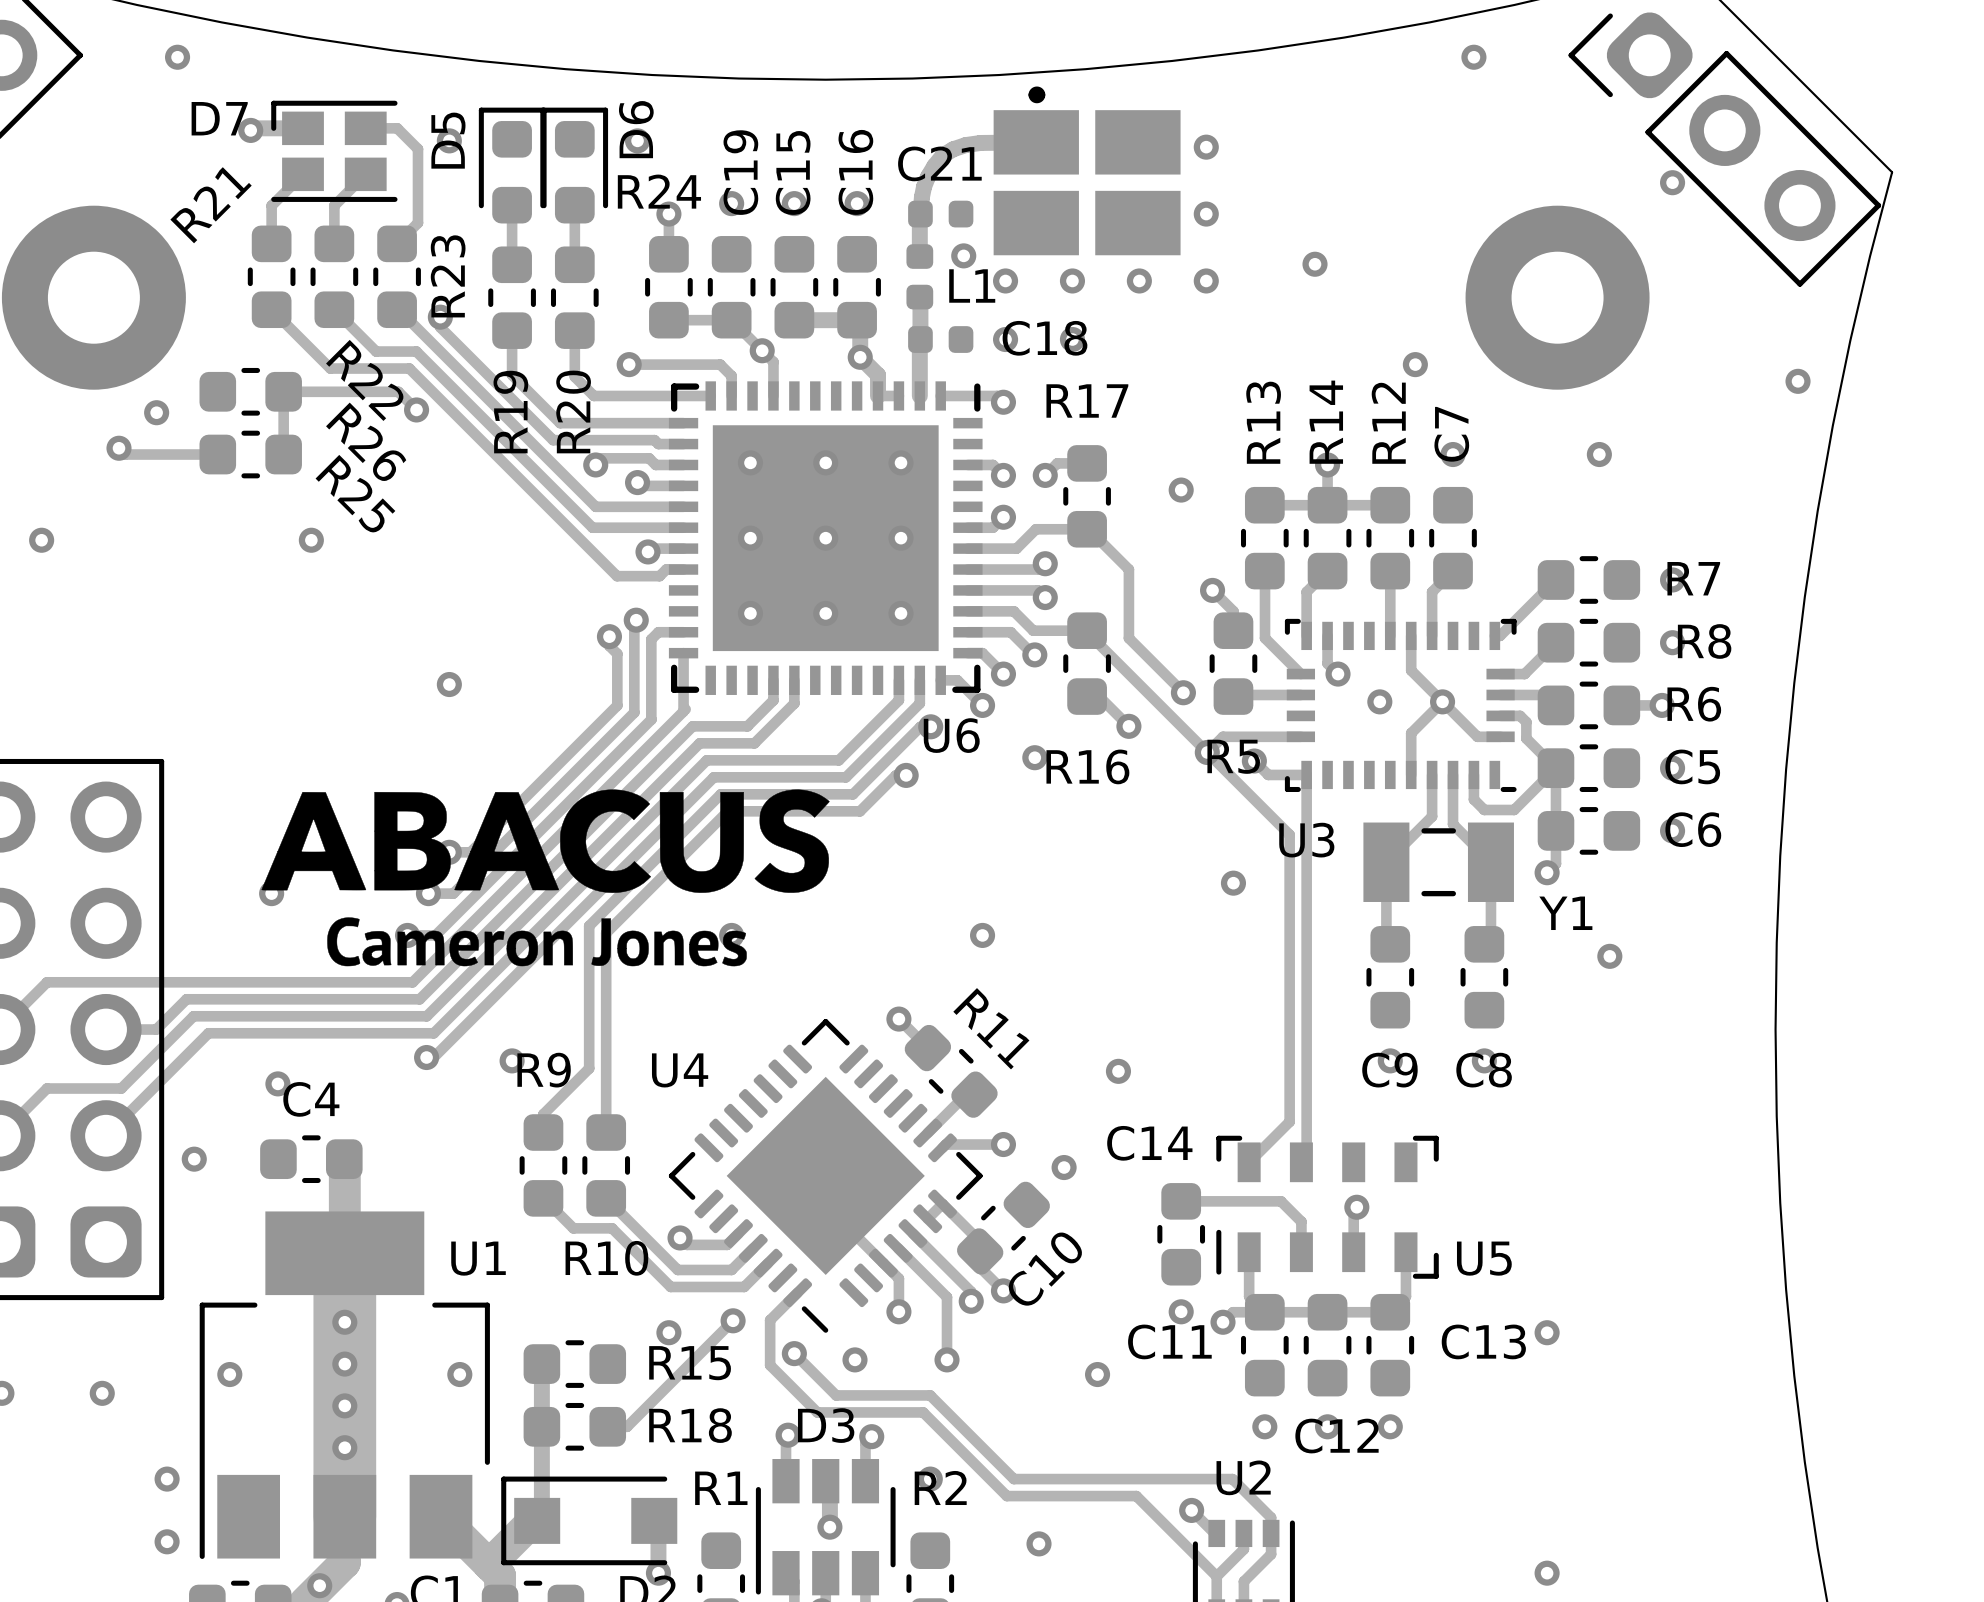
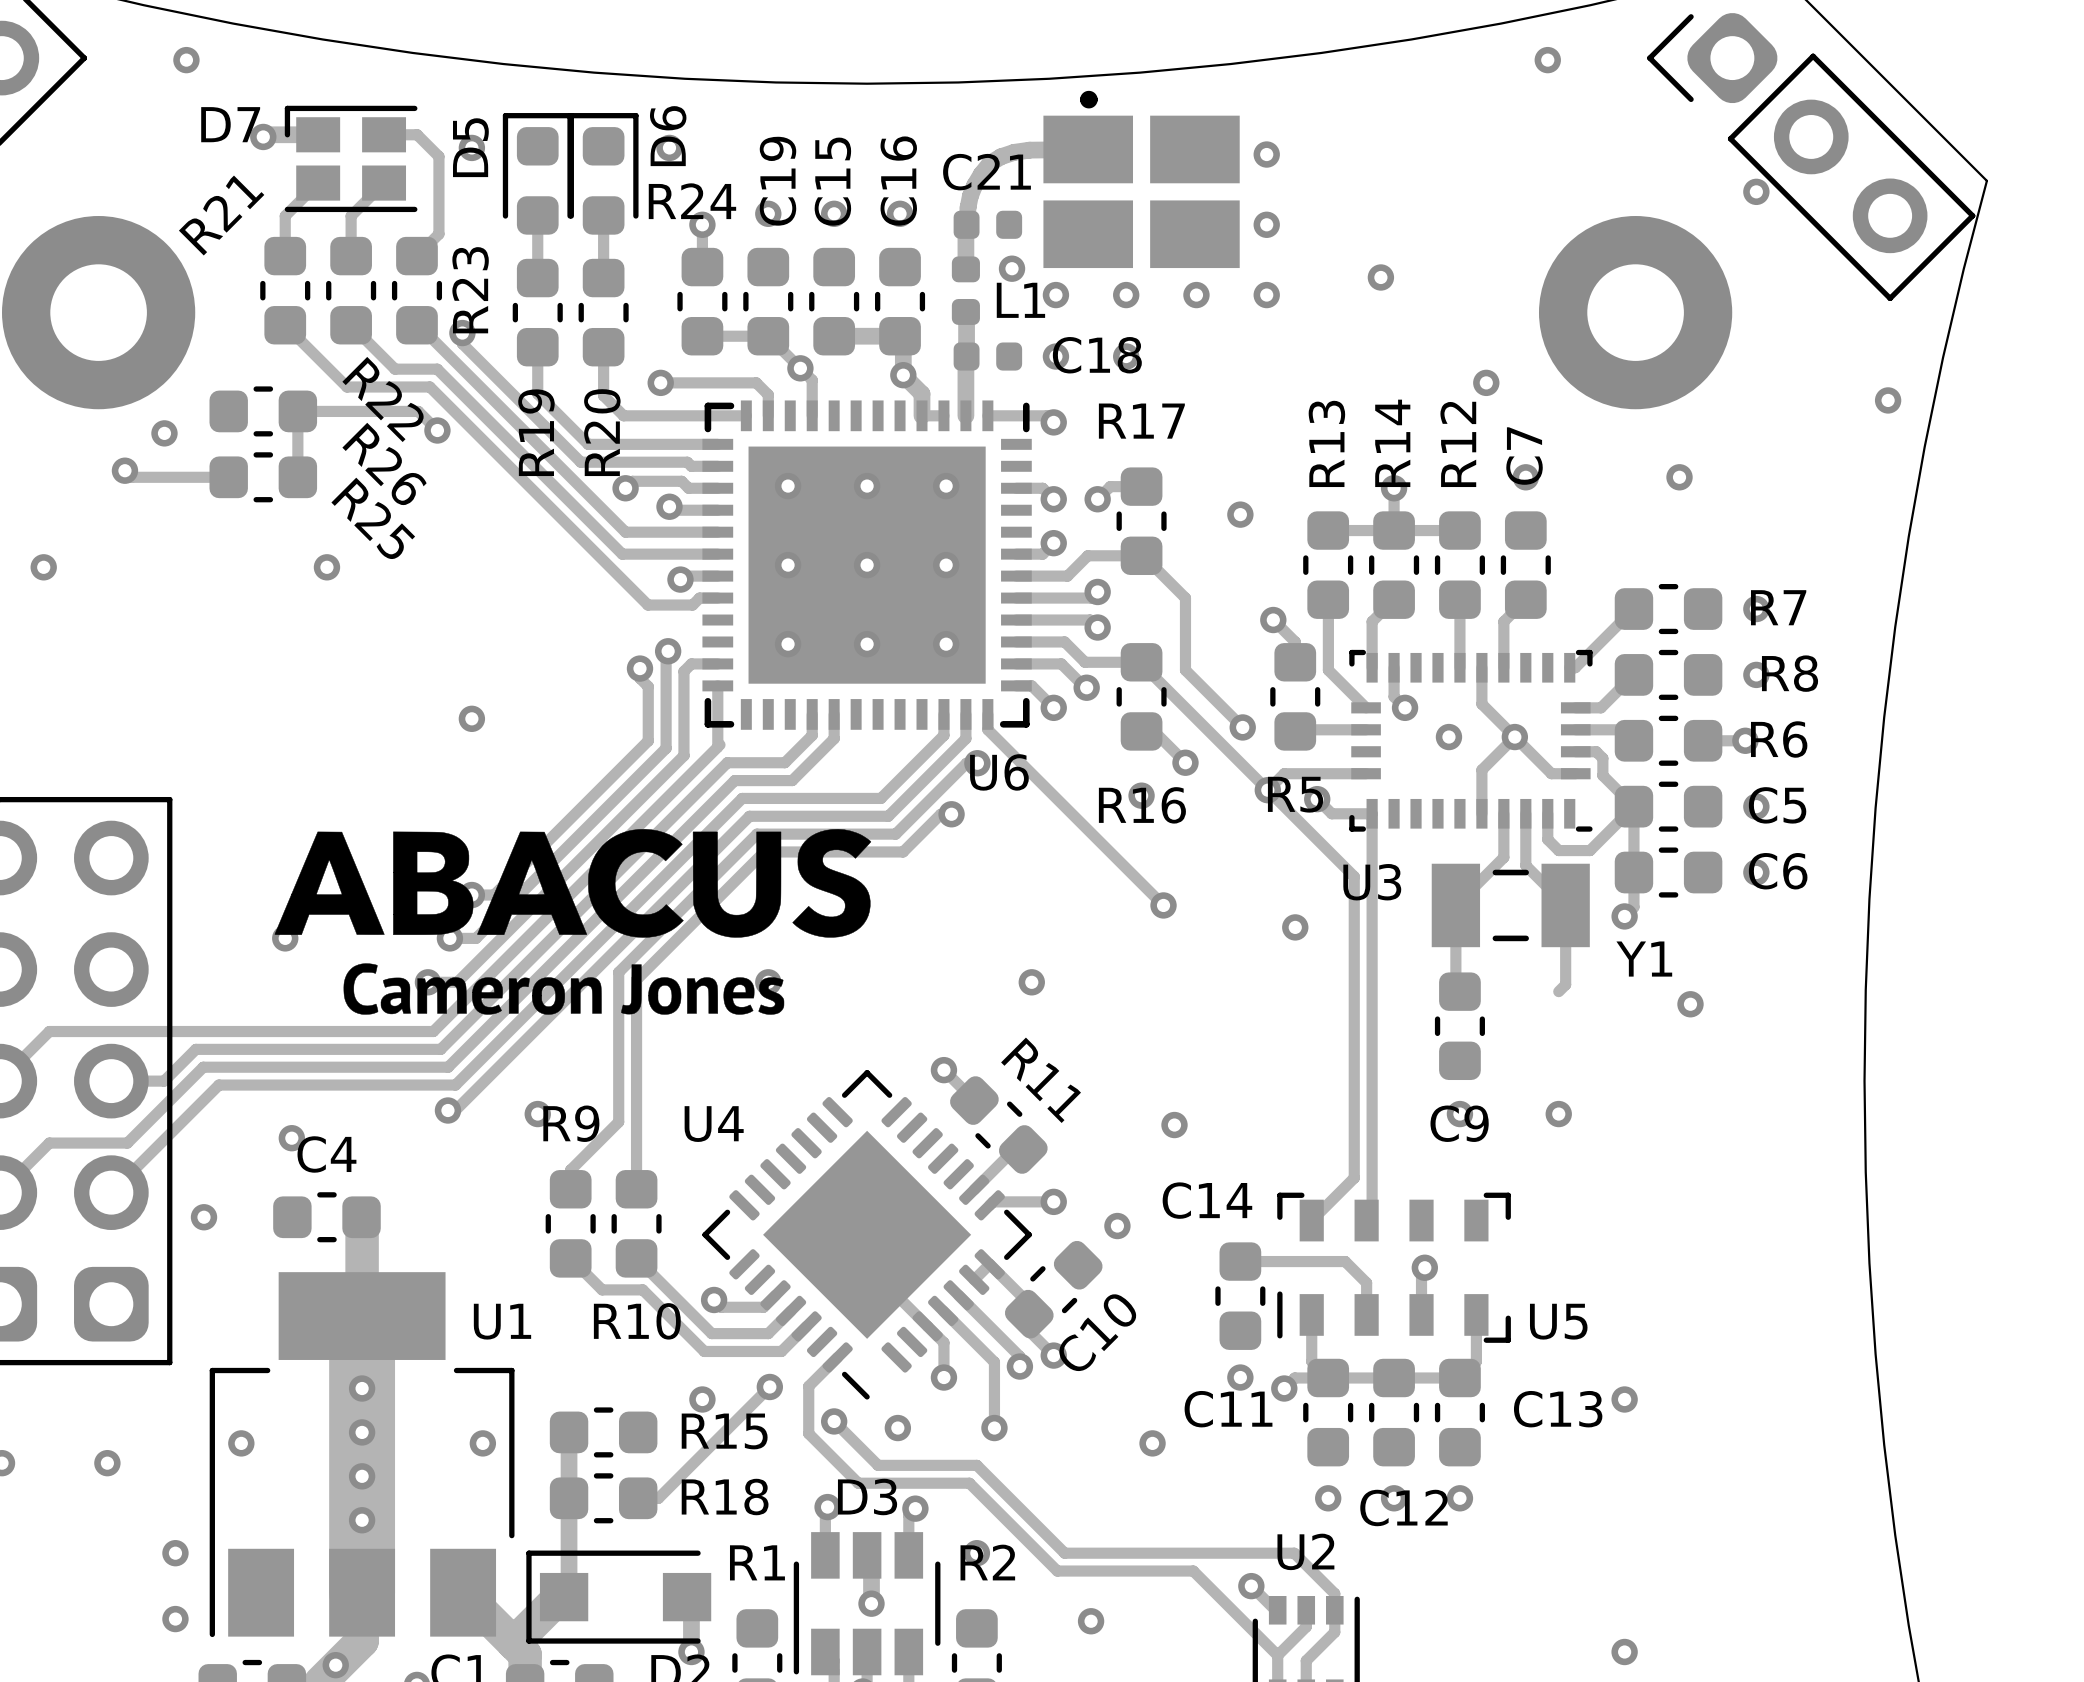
track: (940, 680) (957, 680) (982, 705) -> (987, 714) (987, 729) (1163, 905)
via: (982, 705) -> none
via position: (1034, 757) -> (1141, 795)
via: none -> (1163, 905)
C8: (1484, 977) -> none

